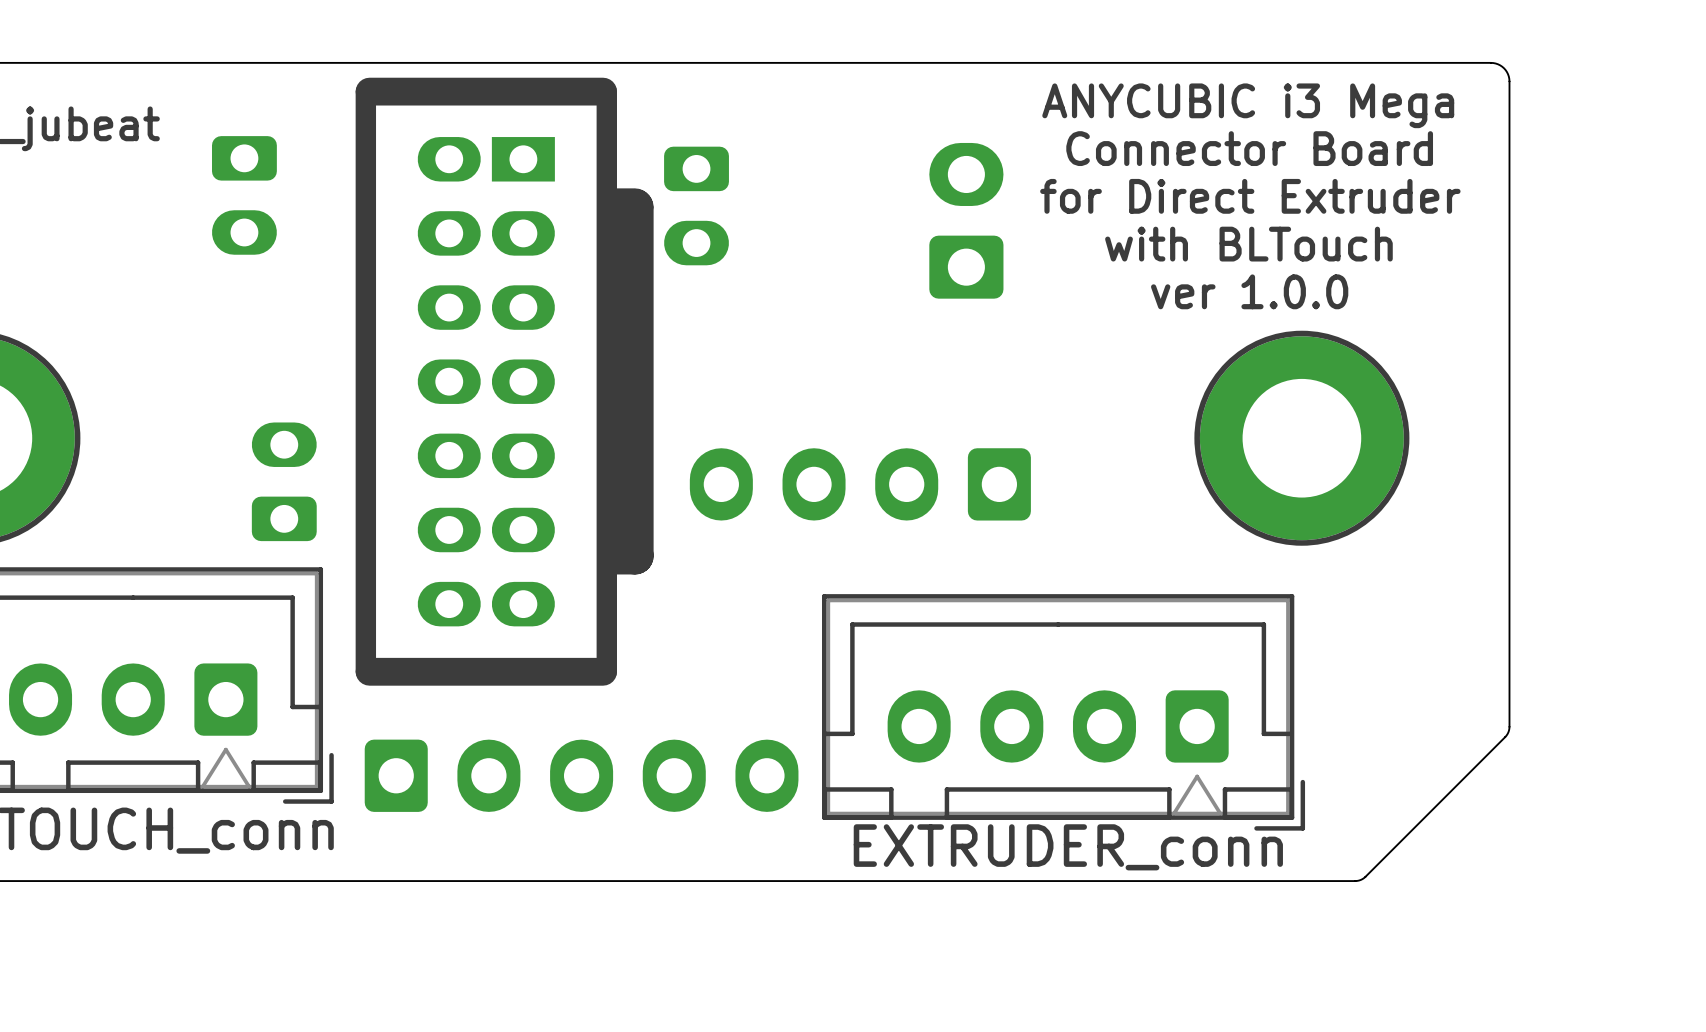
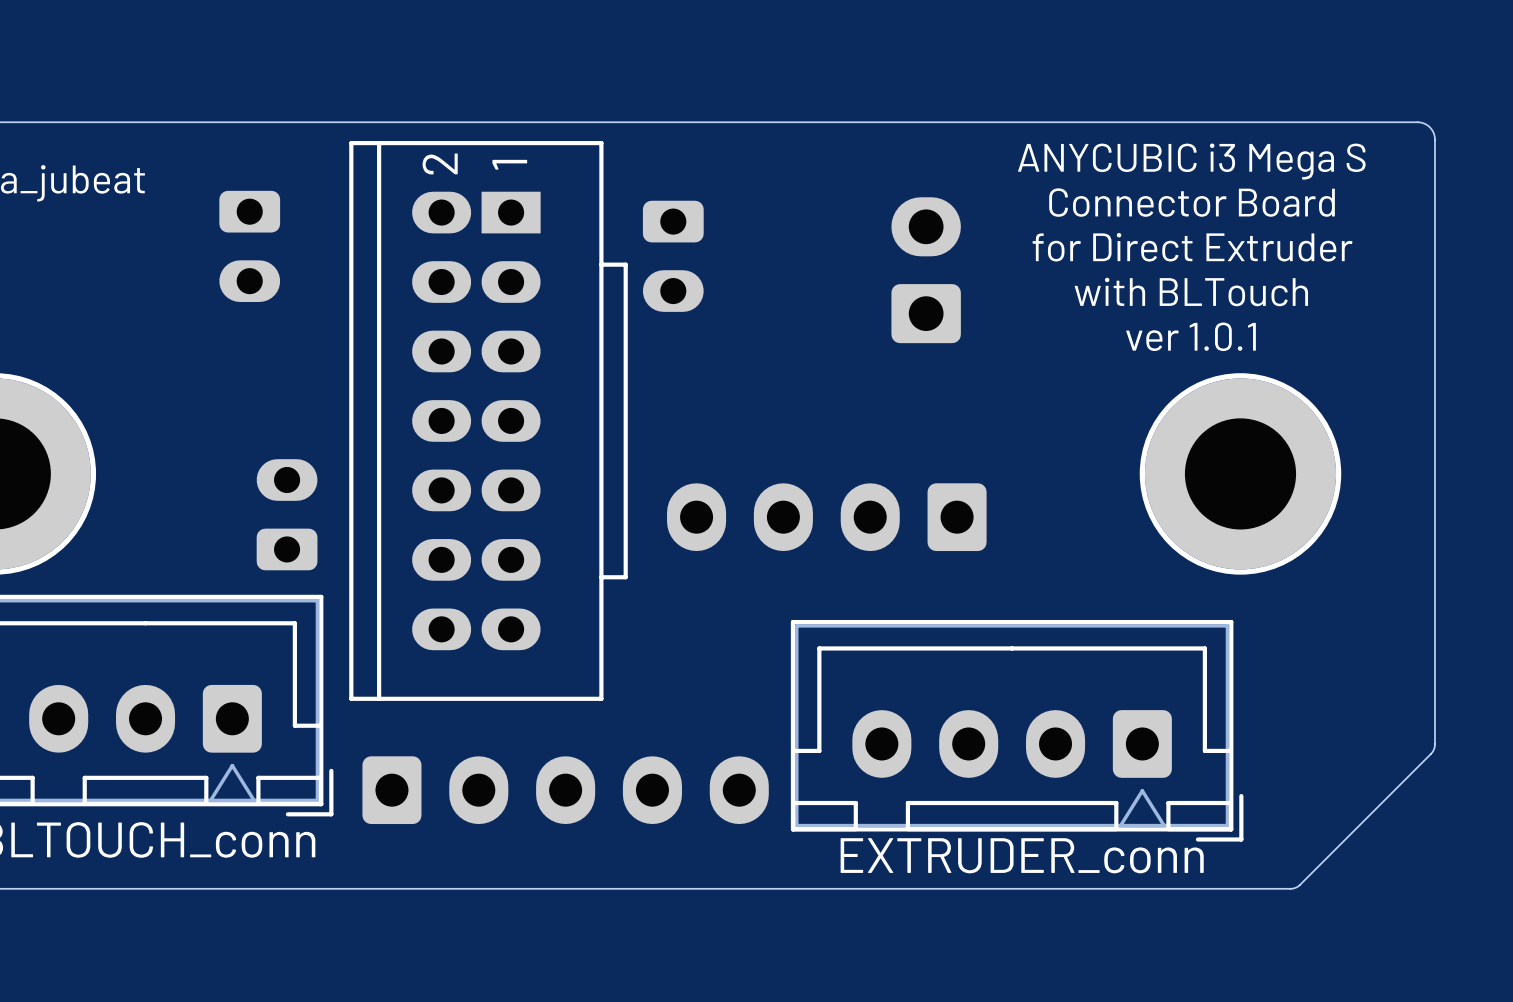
part footprint: [355, 77, 654, 686] -> [349, 141, 628, 701]
text: ANYCUBIC i3 Mega (1248, 105) -> ANYCUBIC i3 Mega S (1191, 161)
text: ver 1.0.0 (1249, 291) -> ver 1.0.1 (1191, 336)

